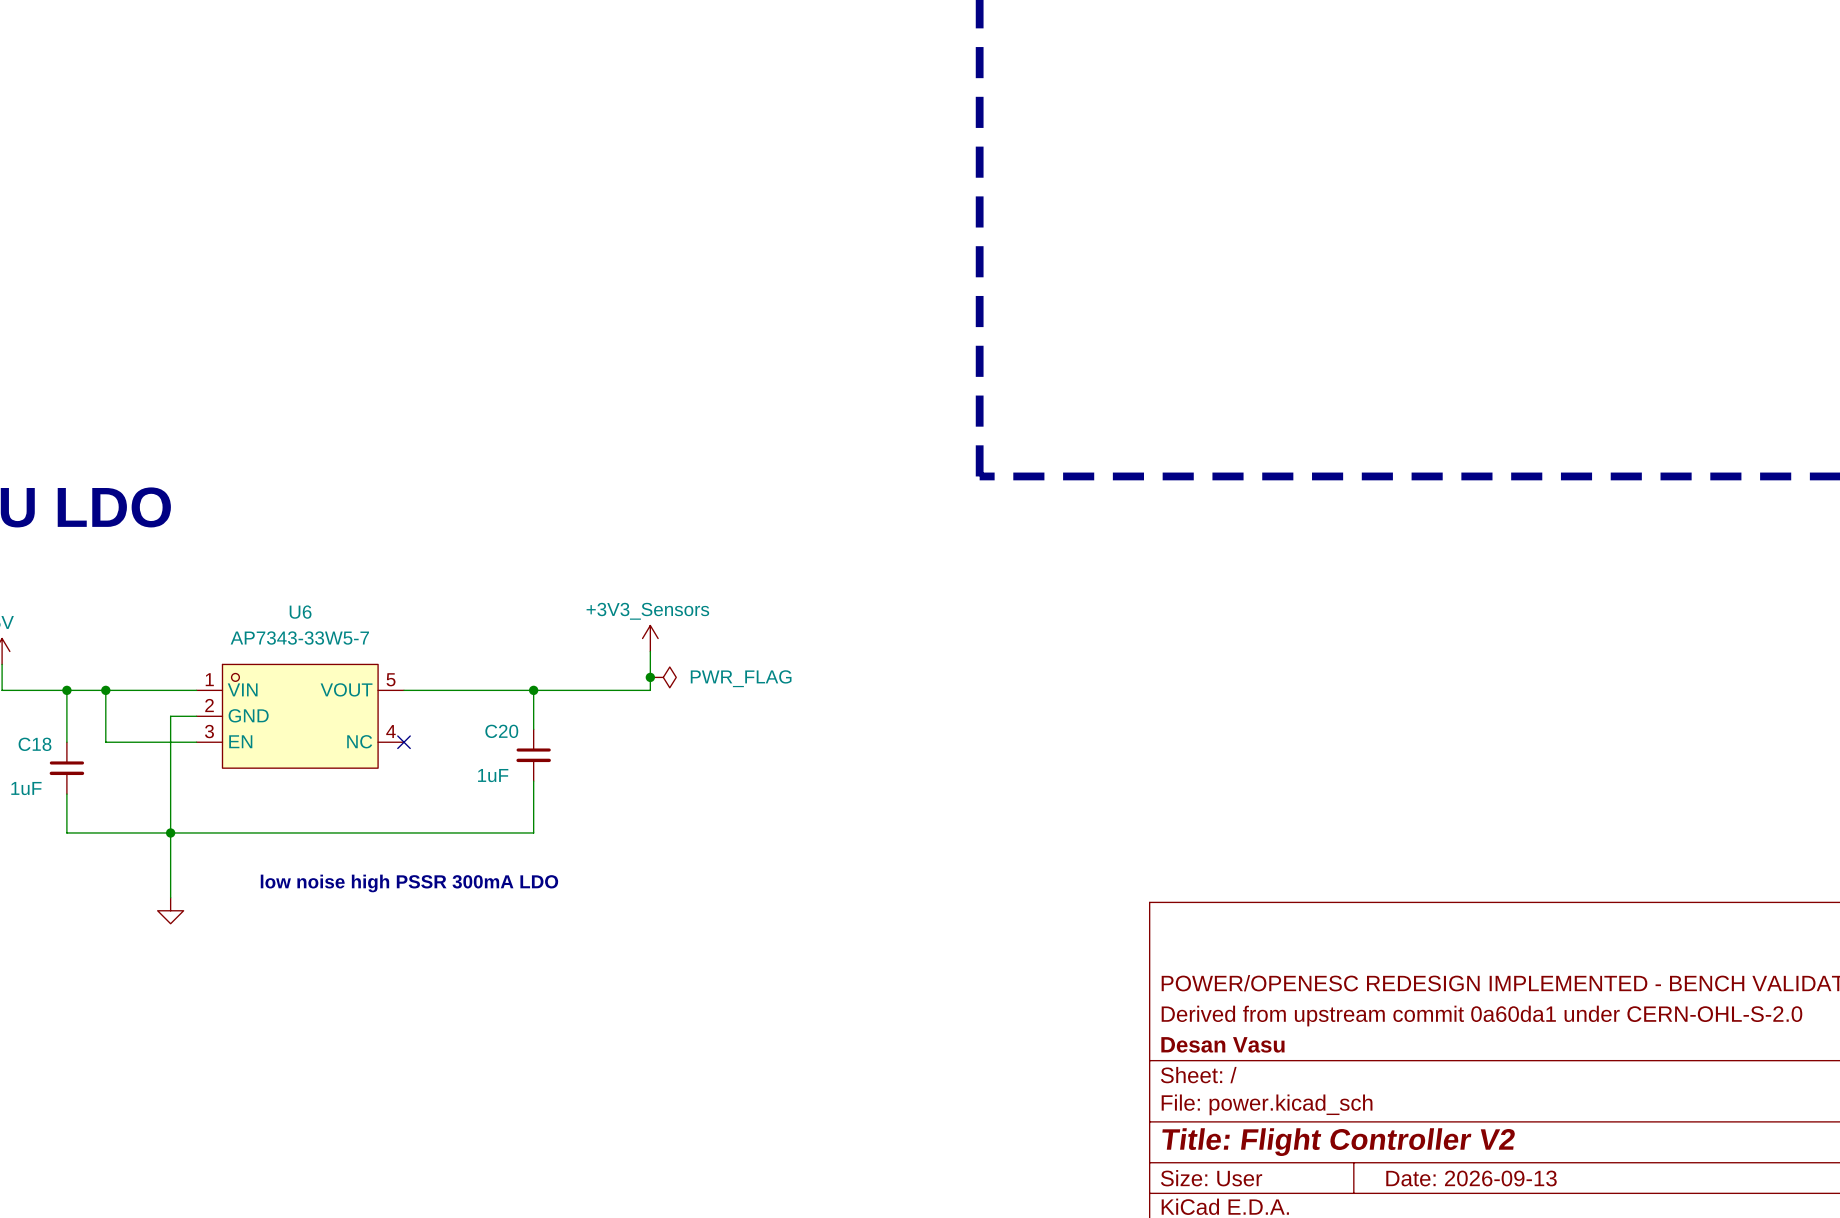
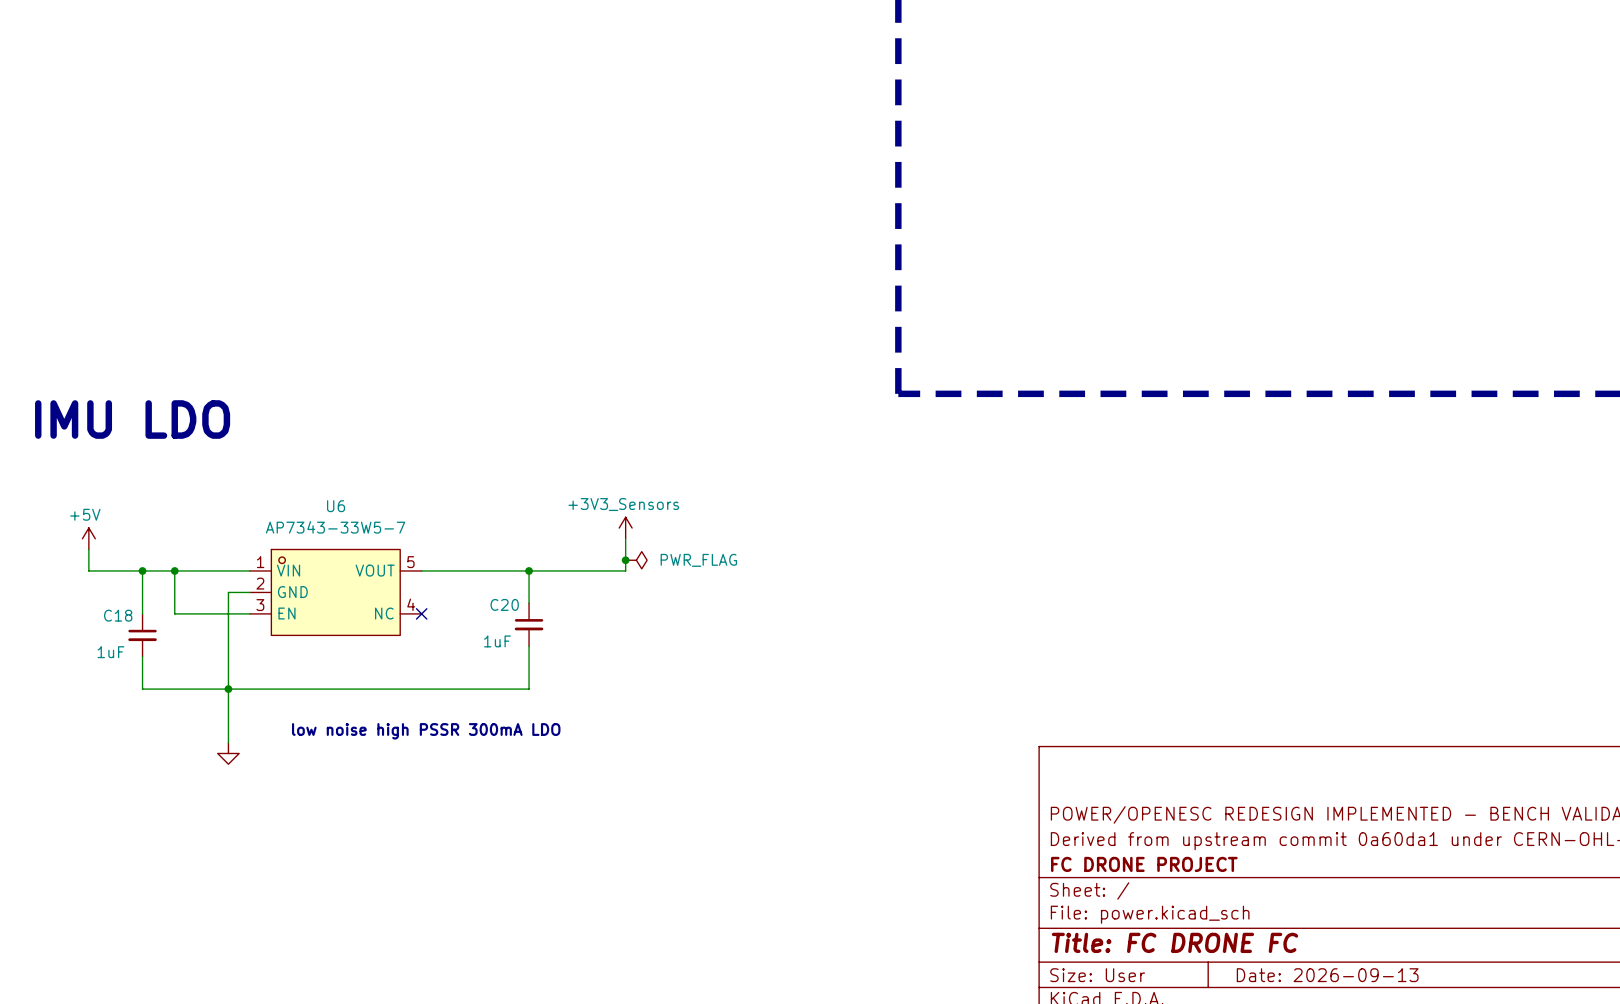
title block: Desan Vasu (1222, 1044) -> FC DRONE PROJECT (1144, 864)
title block: Title: Flight Controller V2 (1338, 1142) -> Title: FC DRONE FC (1174, 942)

